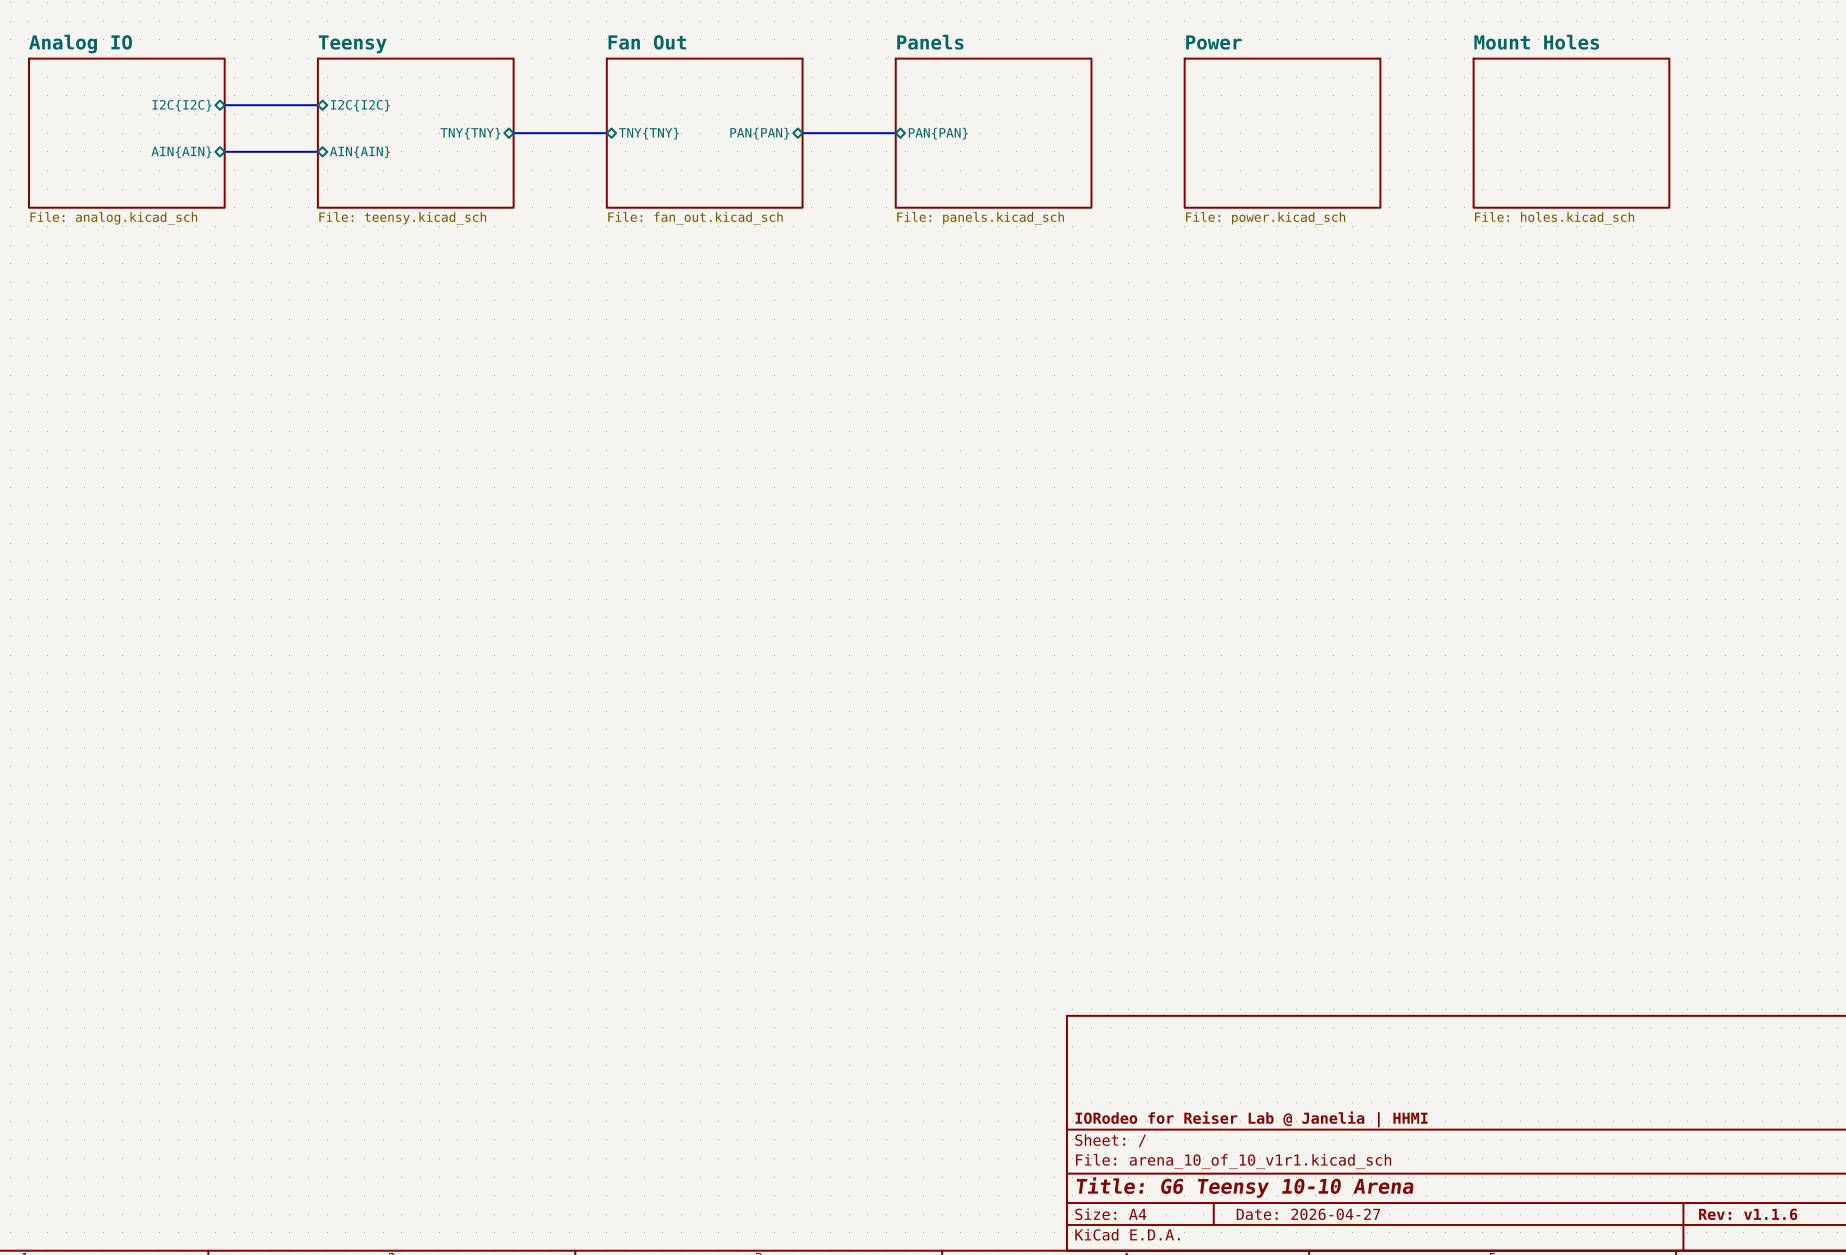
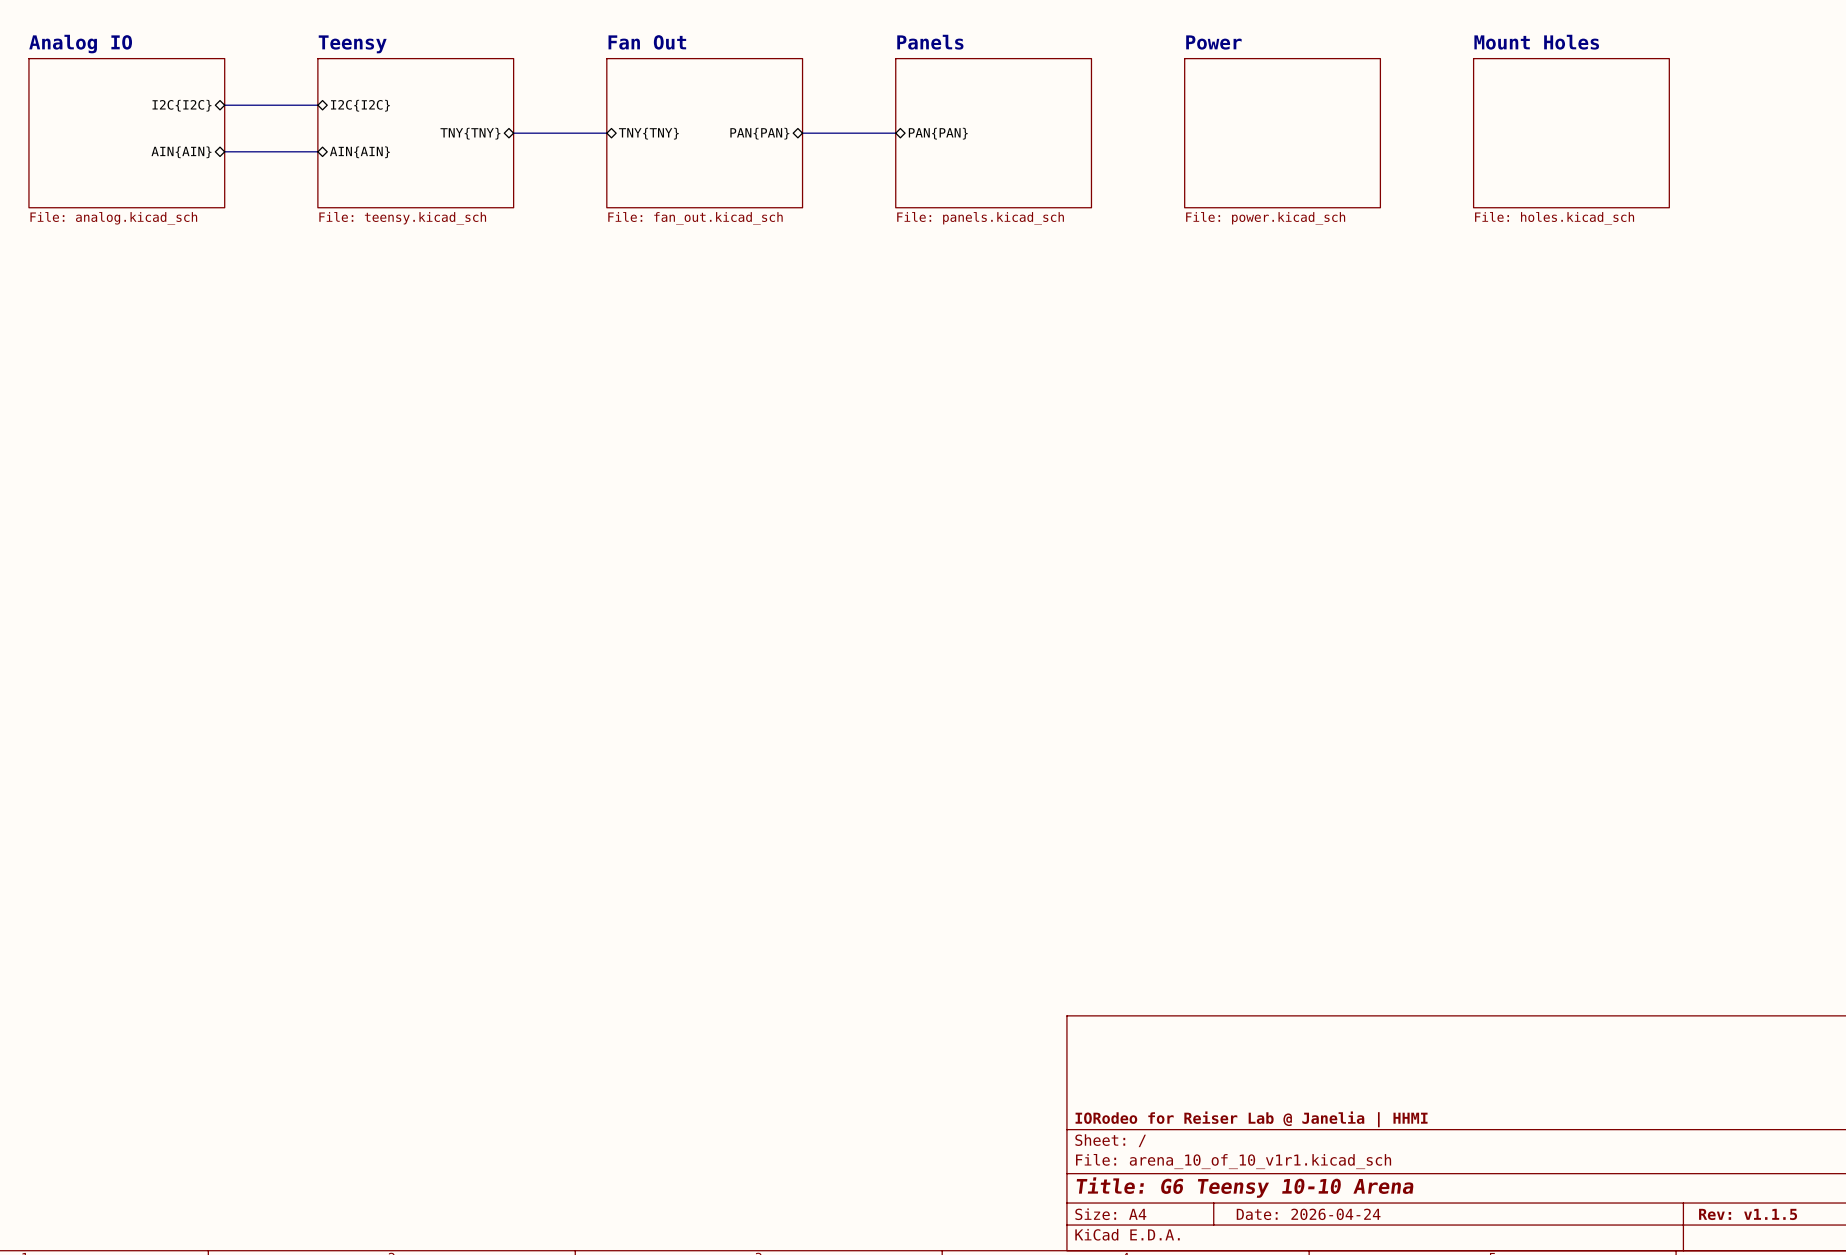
title block: Date: 2026-04-27 (1308, 1214) -> Date: 2026-04-24 (1308, 1214)
title block: Rev: v1.1.6 (1748, 1214) -> Rev: v1.1.5 (1748, 1214)

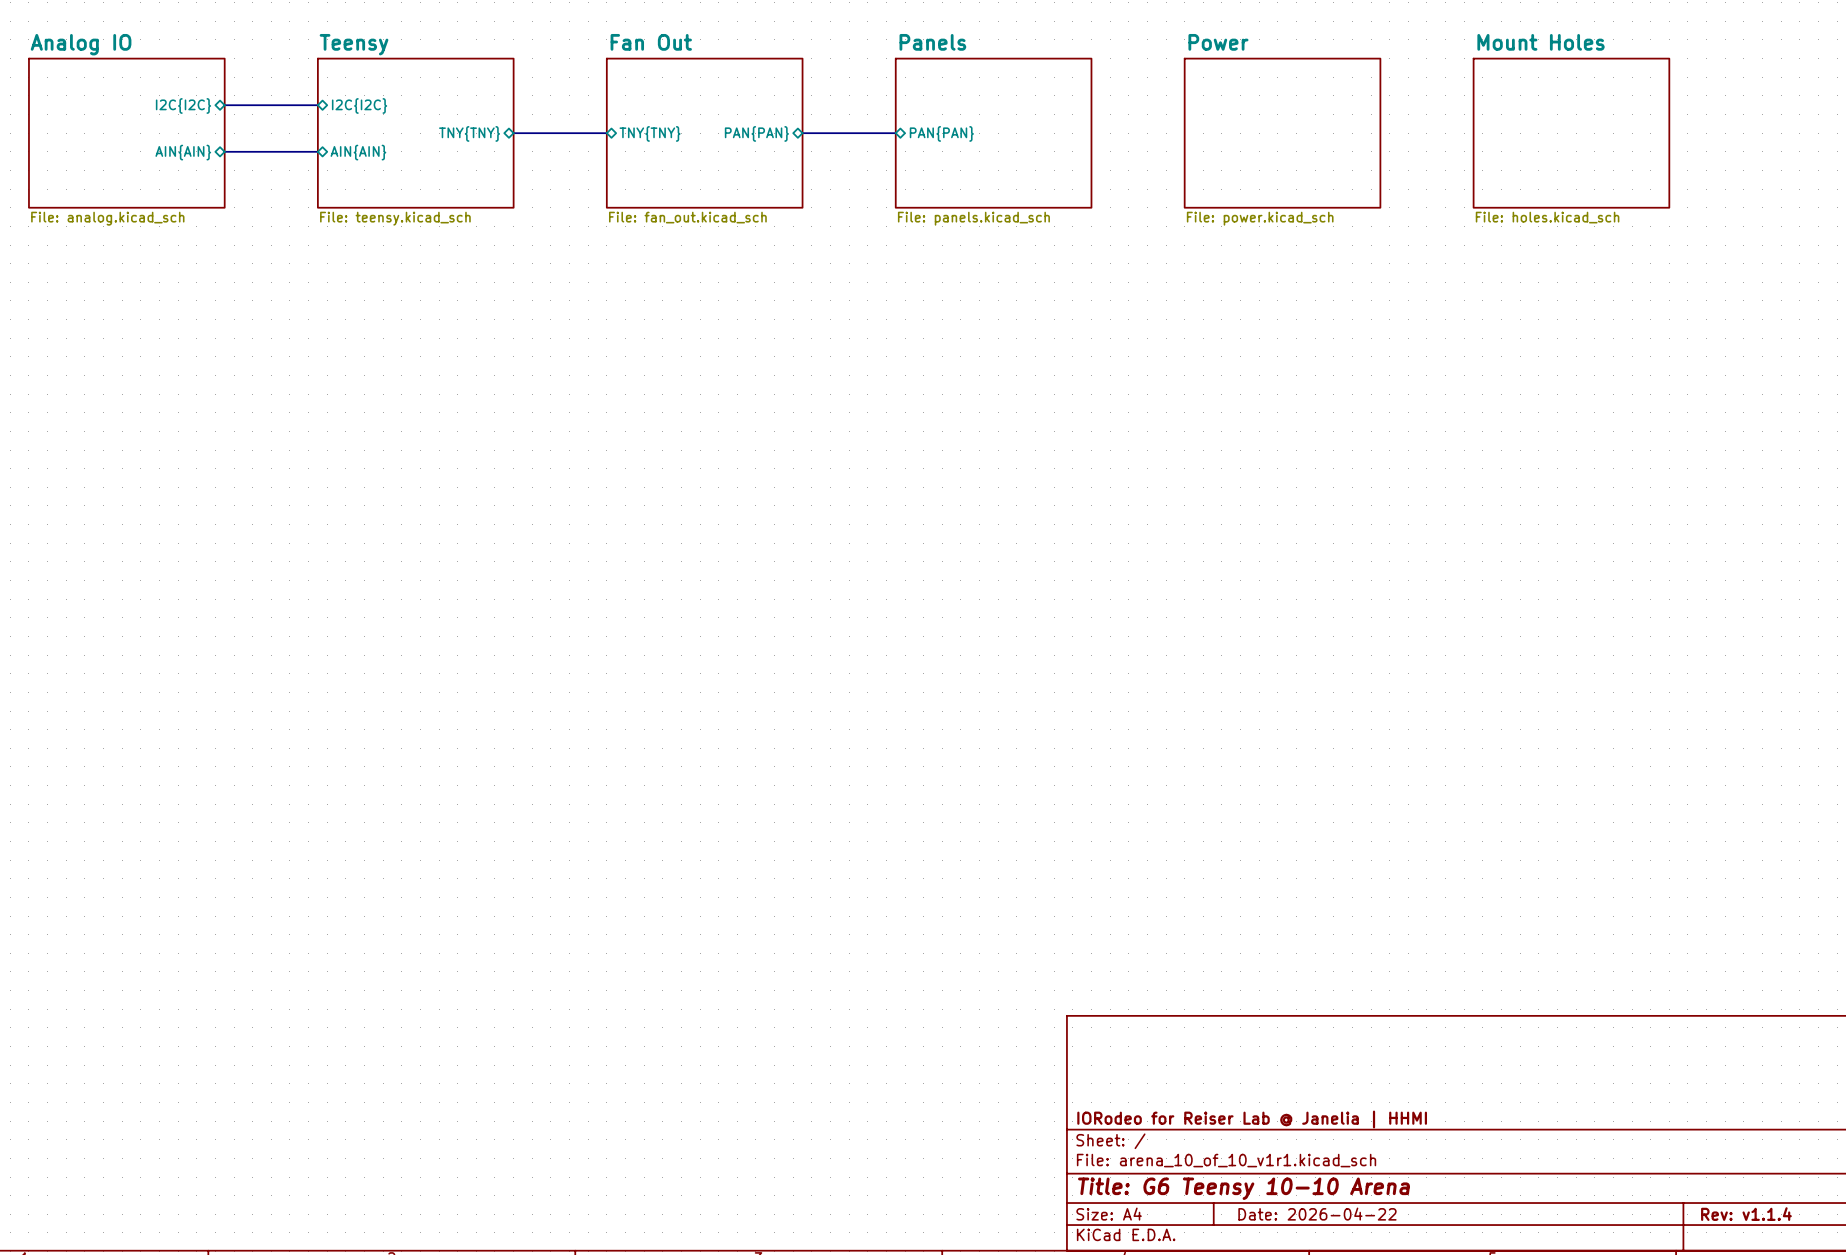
title block: Date: 2026-04-24 (1308, 1214) -> Date: 2026-04-22 (1317, 1214)
title block: Rev: v1.1.5 (1748, 1214) -> Rev: v1.1.4 (1746, 1214)

